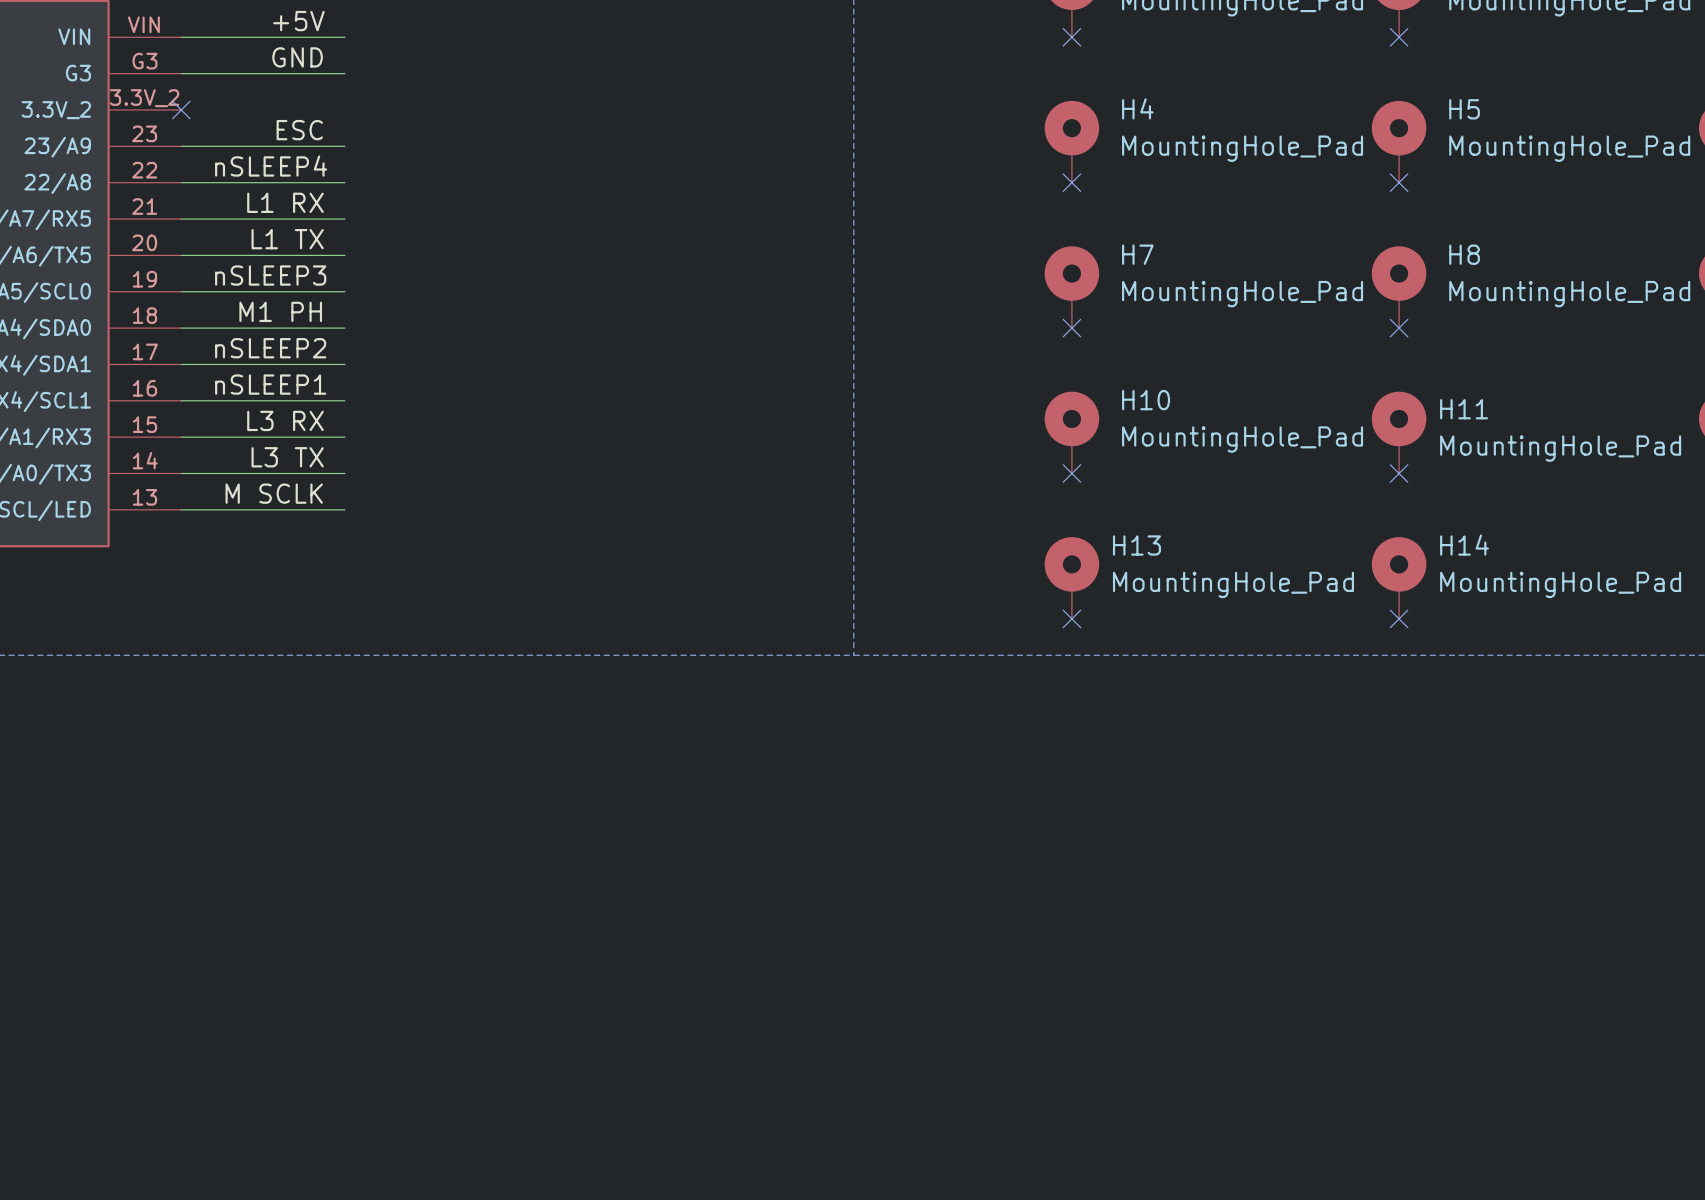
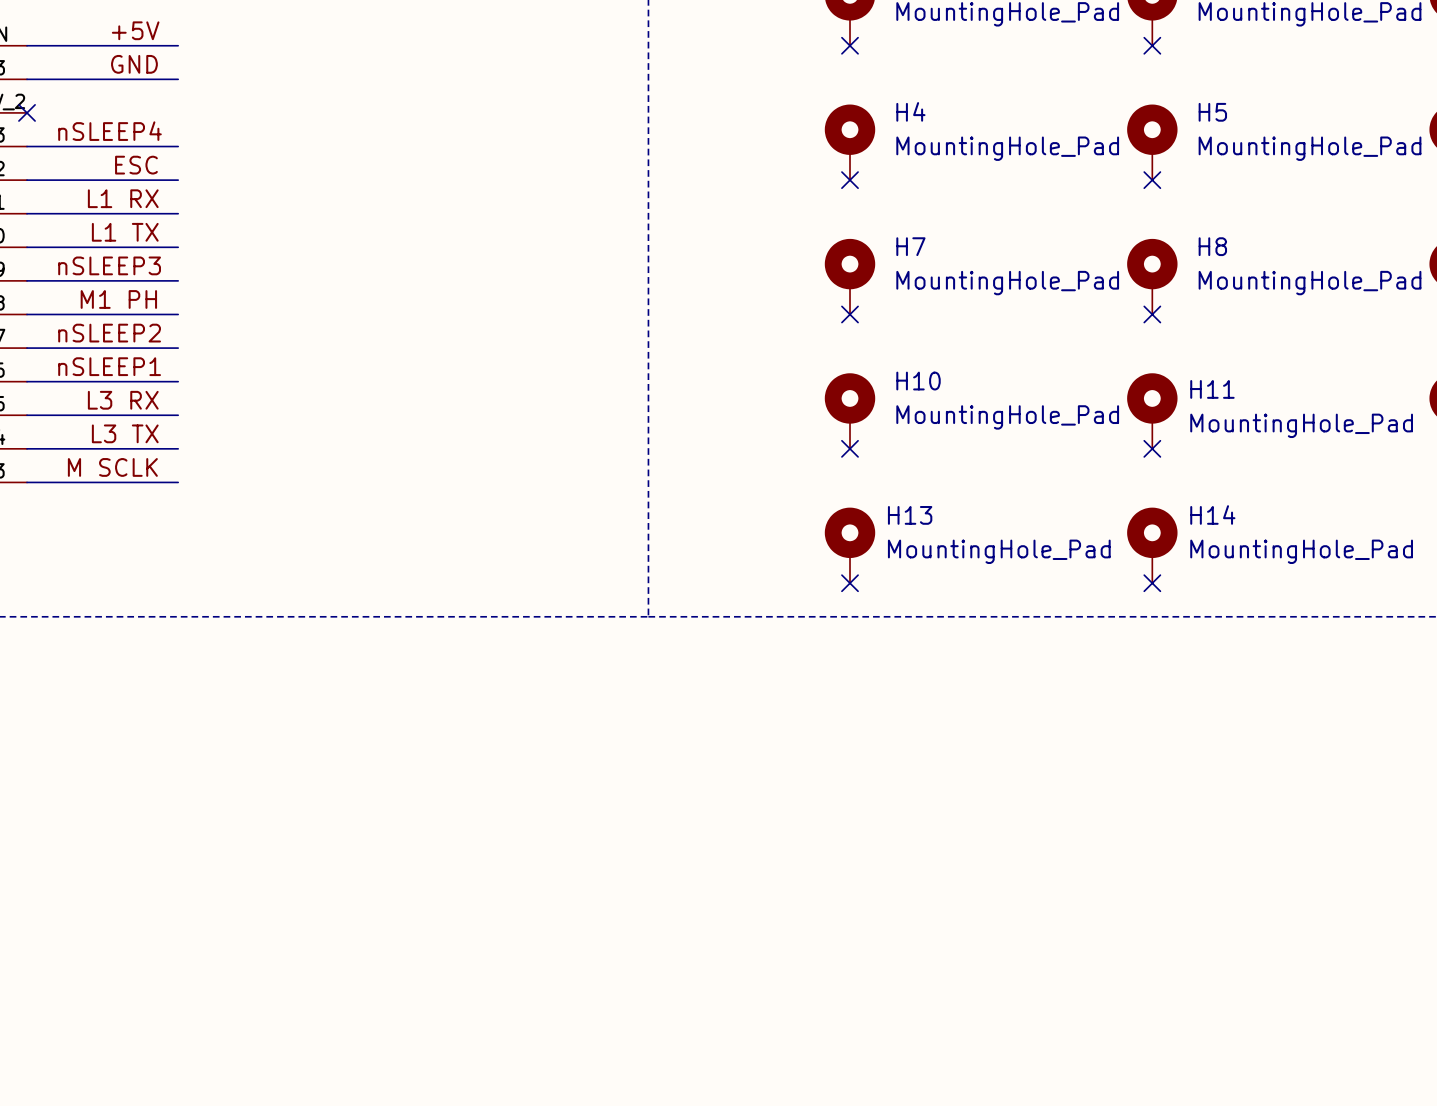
label position: ESC (299, 130) -> ESC (136, 165)
label position: nSLEEP4 (271, 166) -> nSLEEP4 (109, 131)

